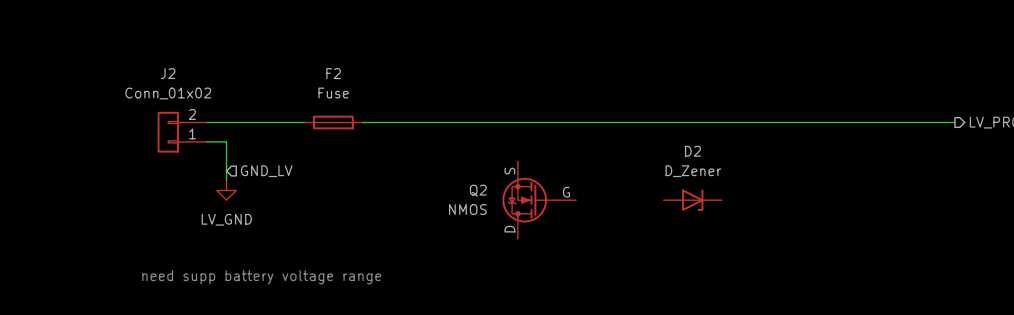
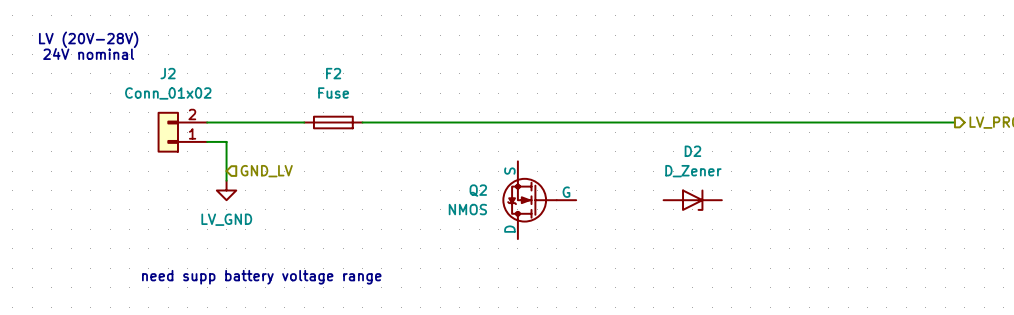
text: none -> LV (20V-28V) (88, 39)
text: none -> 24V nominal (88, 54)

